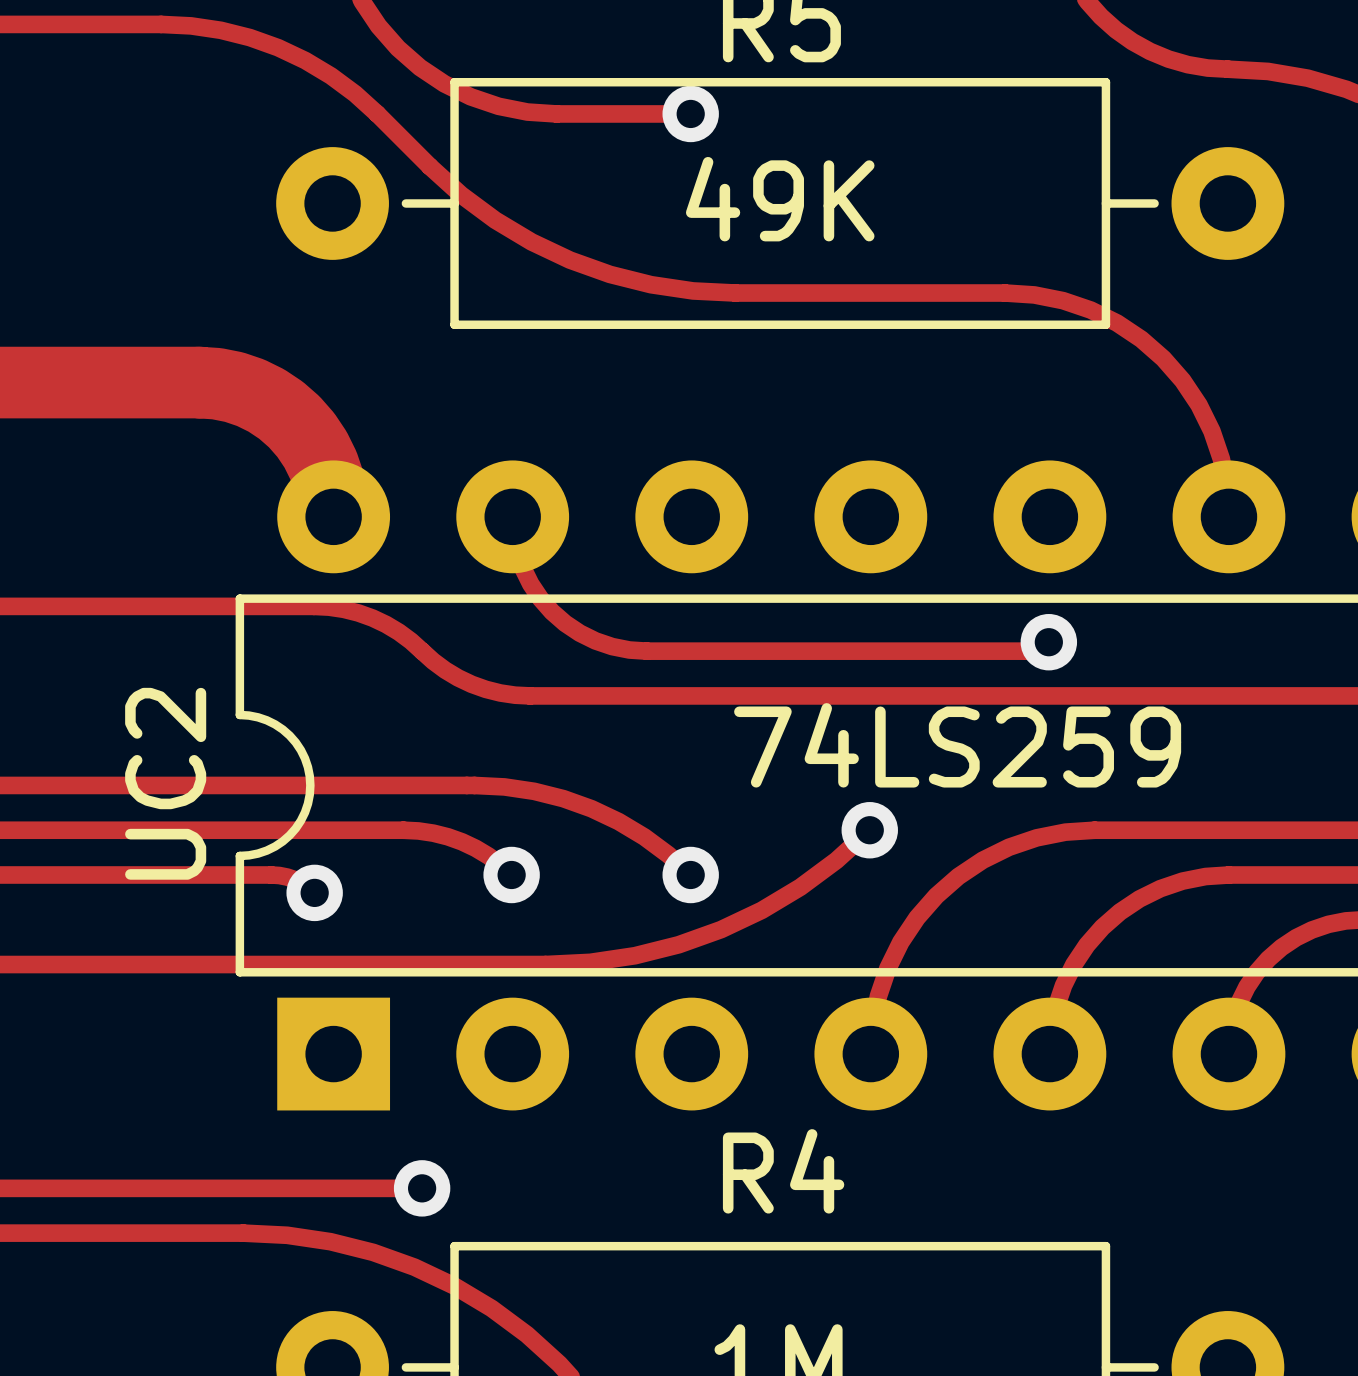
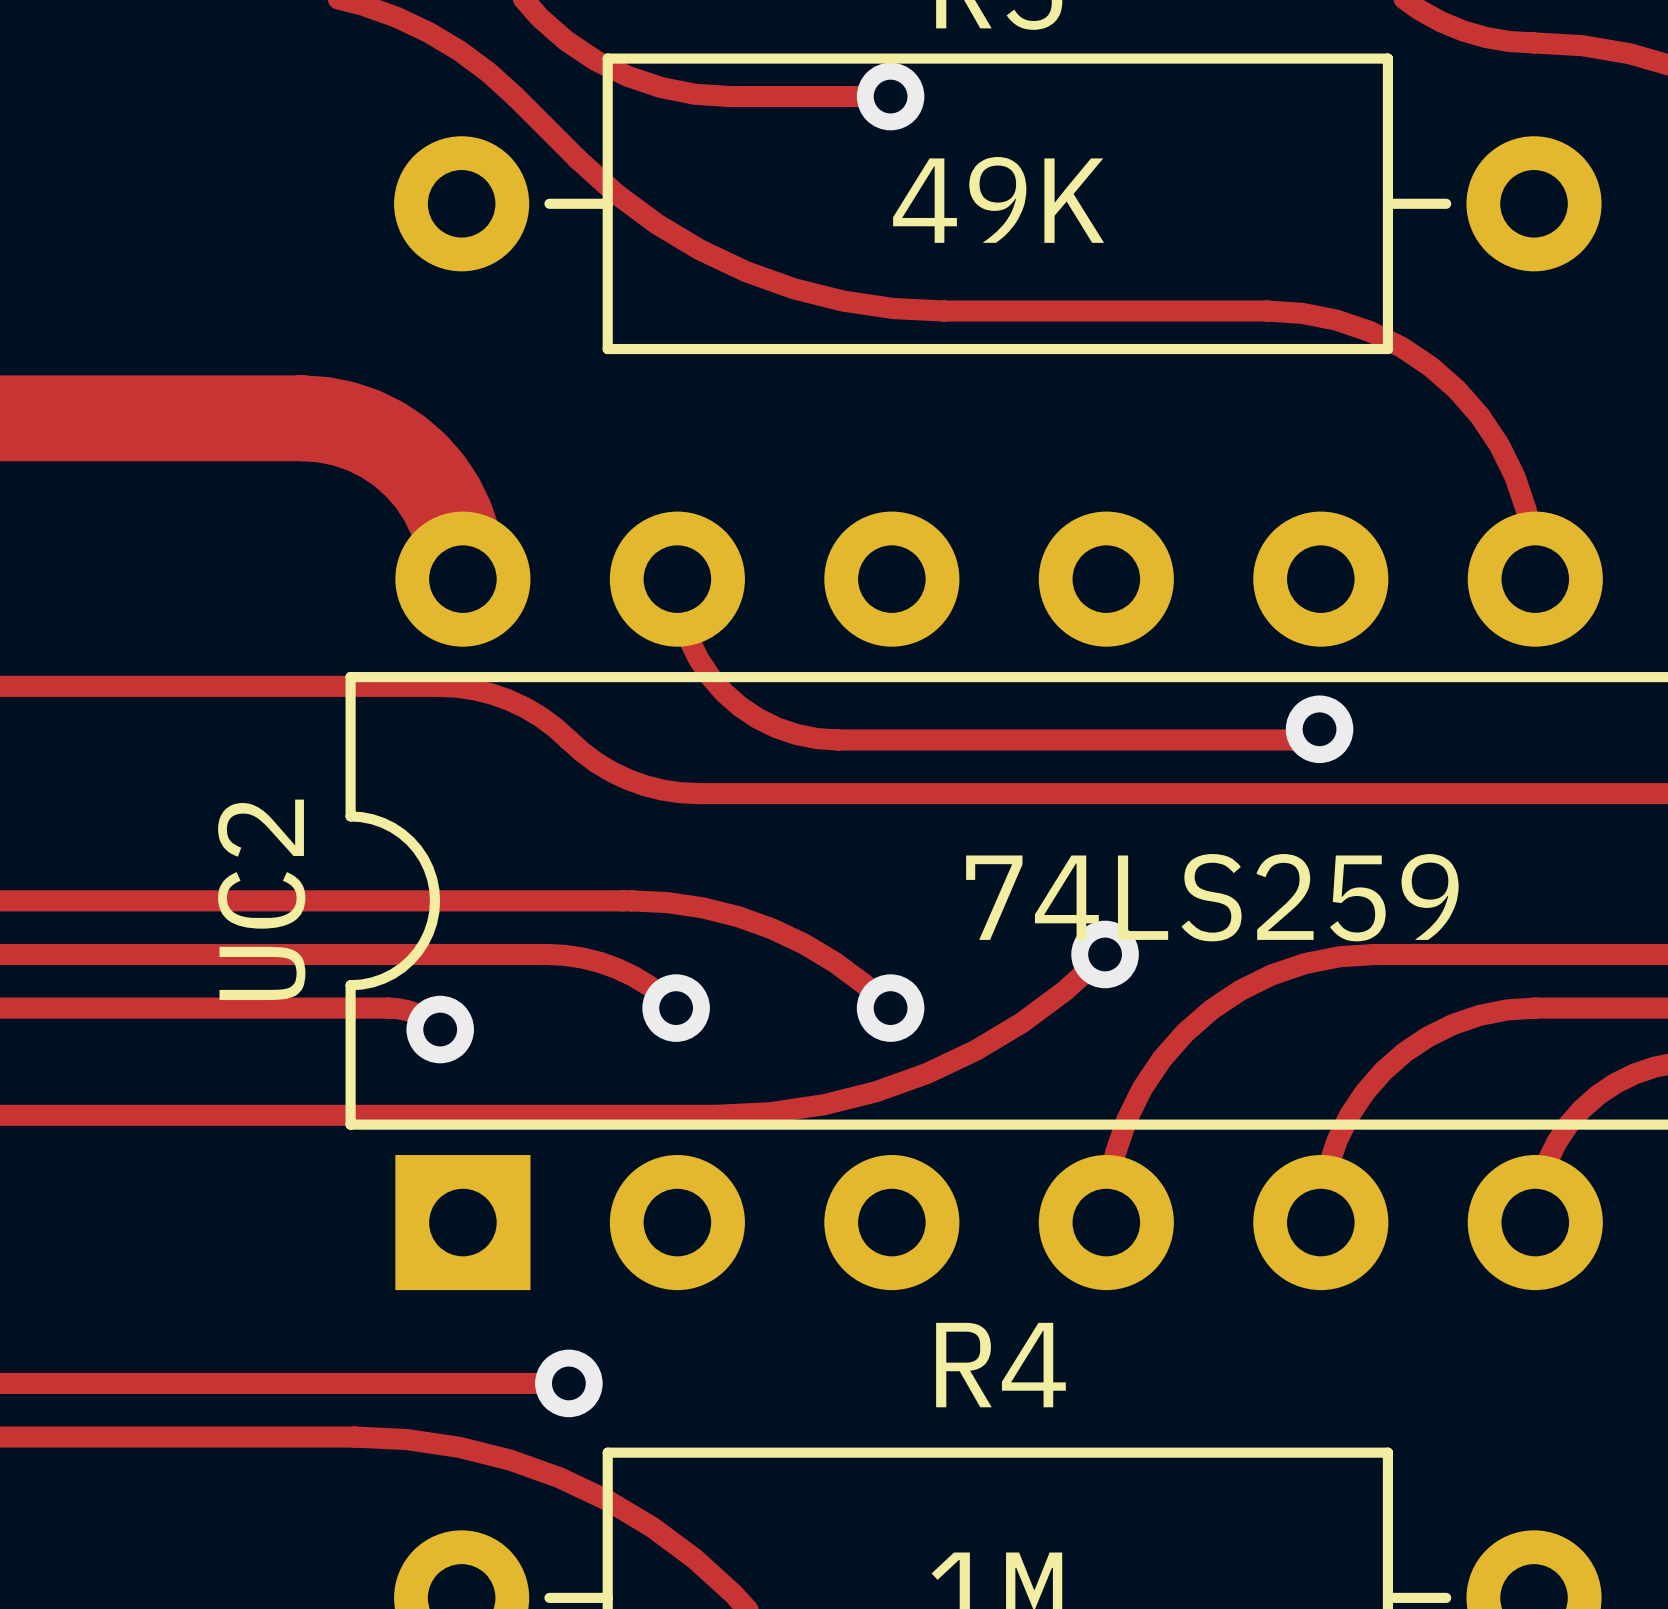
UC2 value position: 74LS259 (957, 745) -> 74LS259 (1212, 897)

